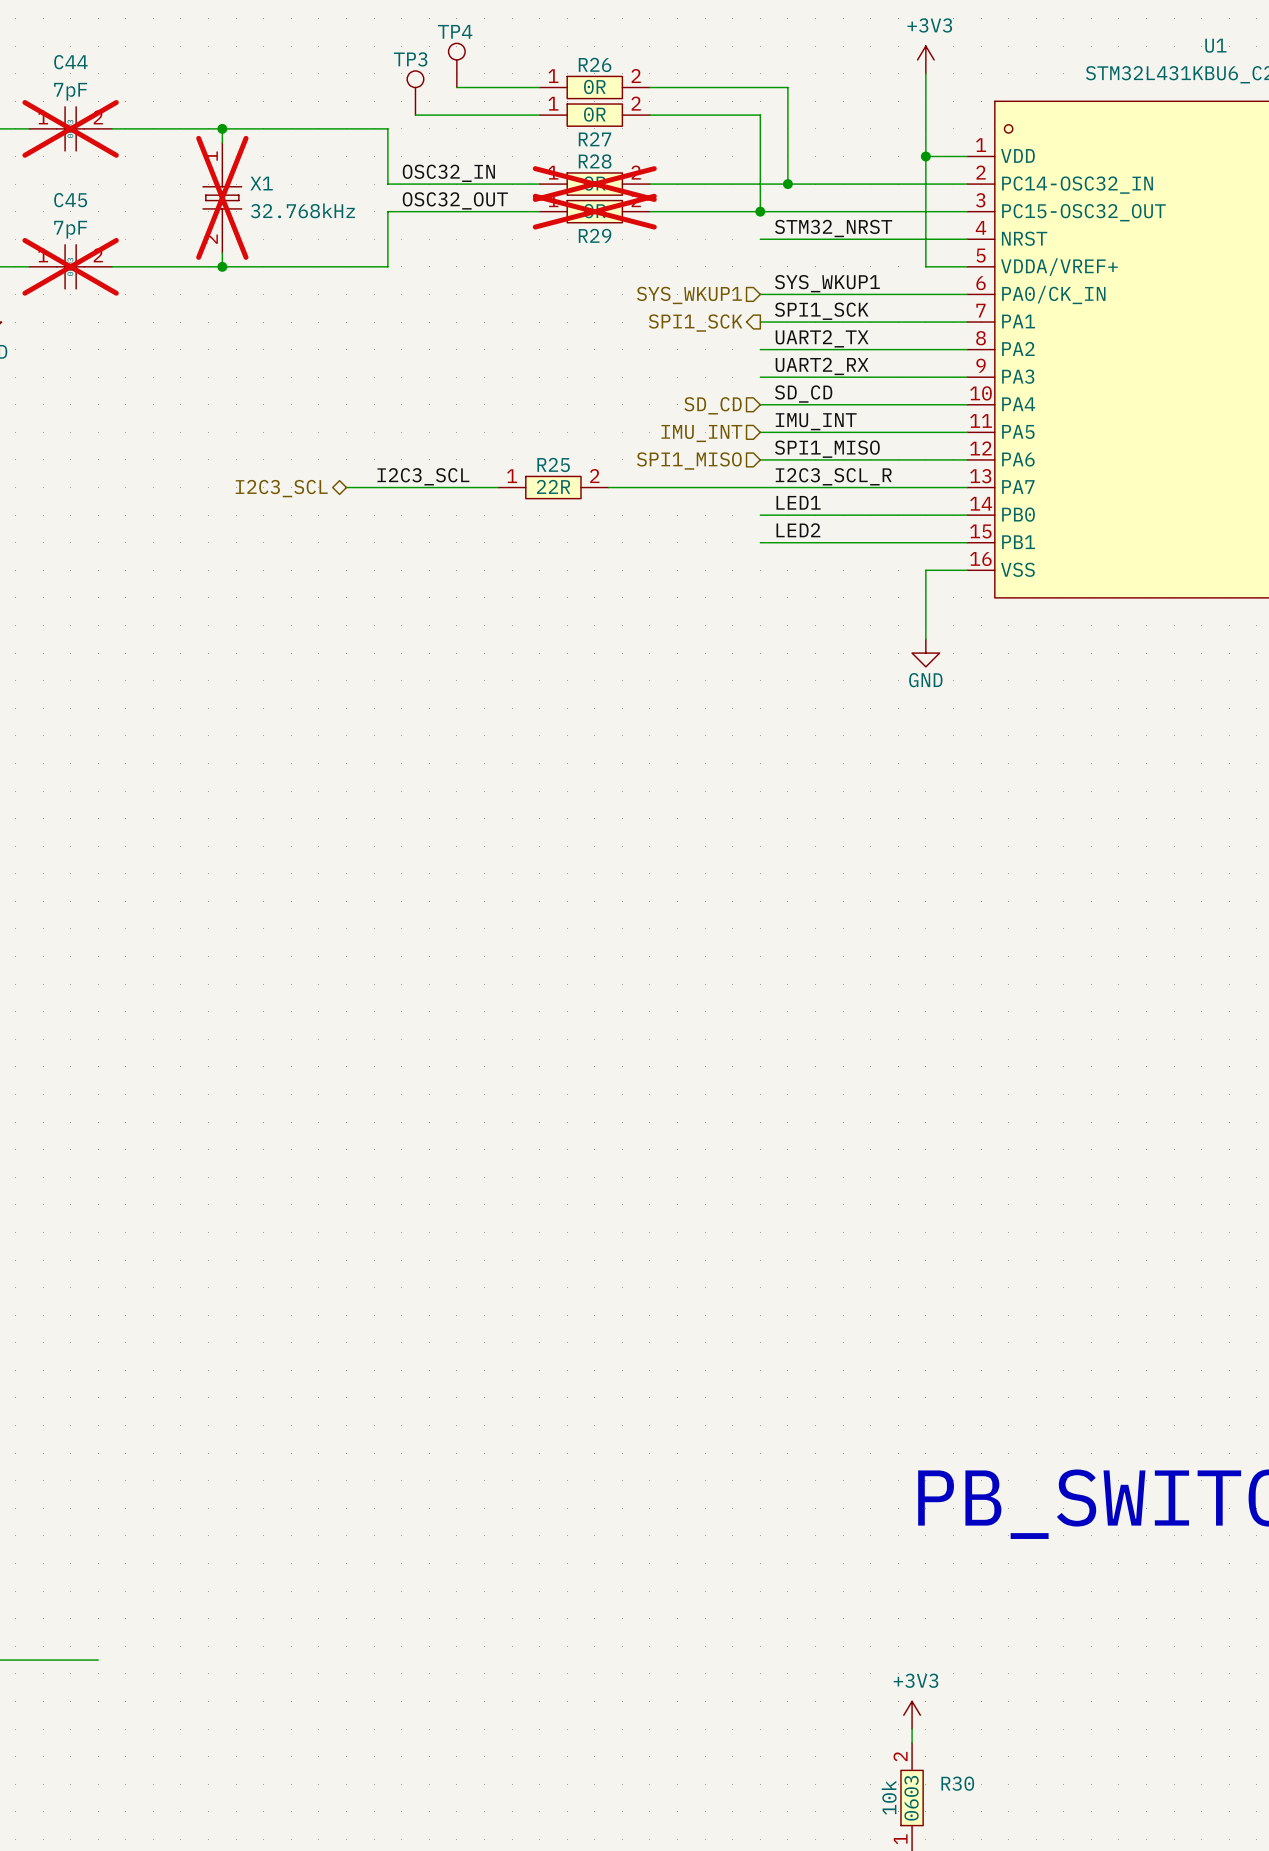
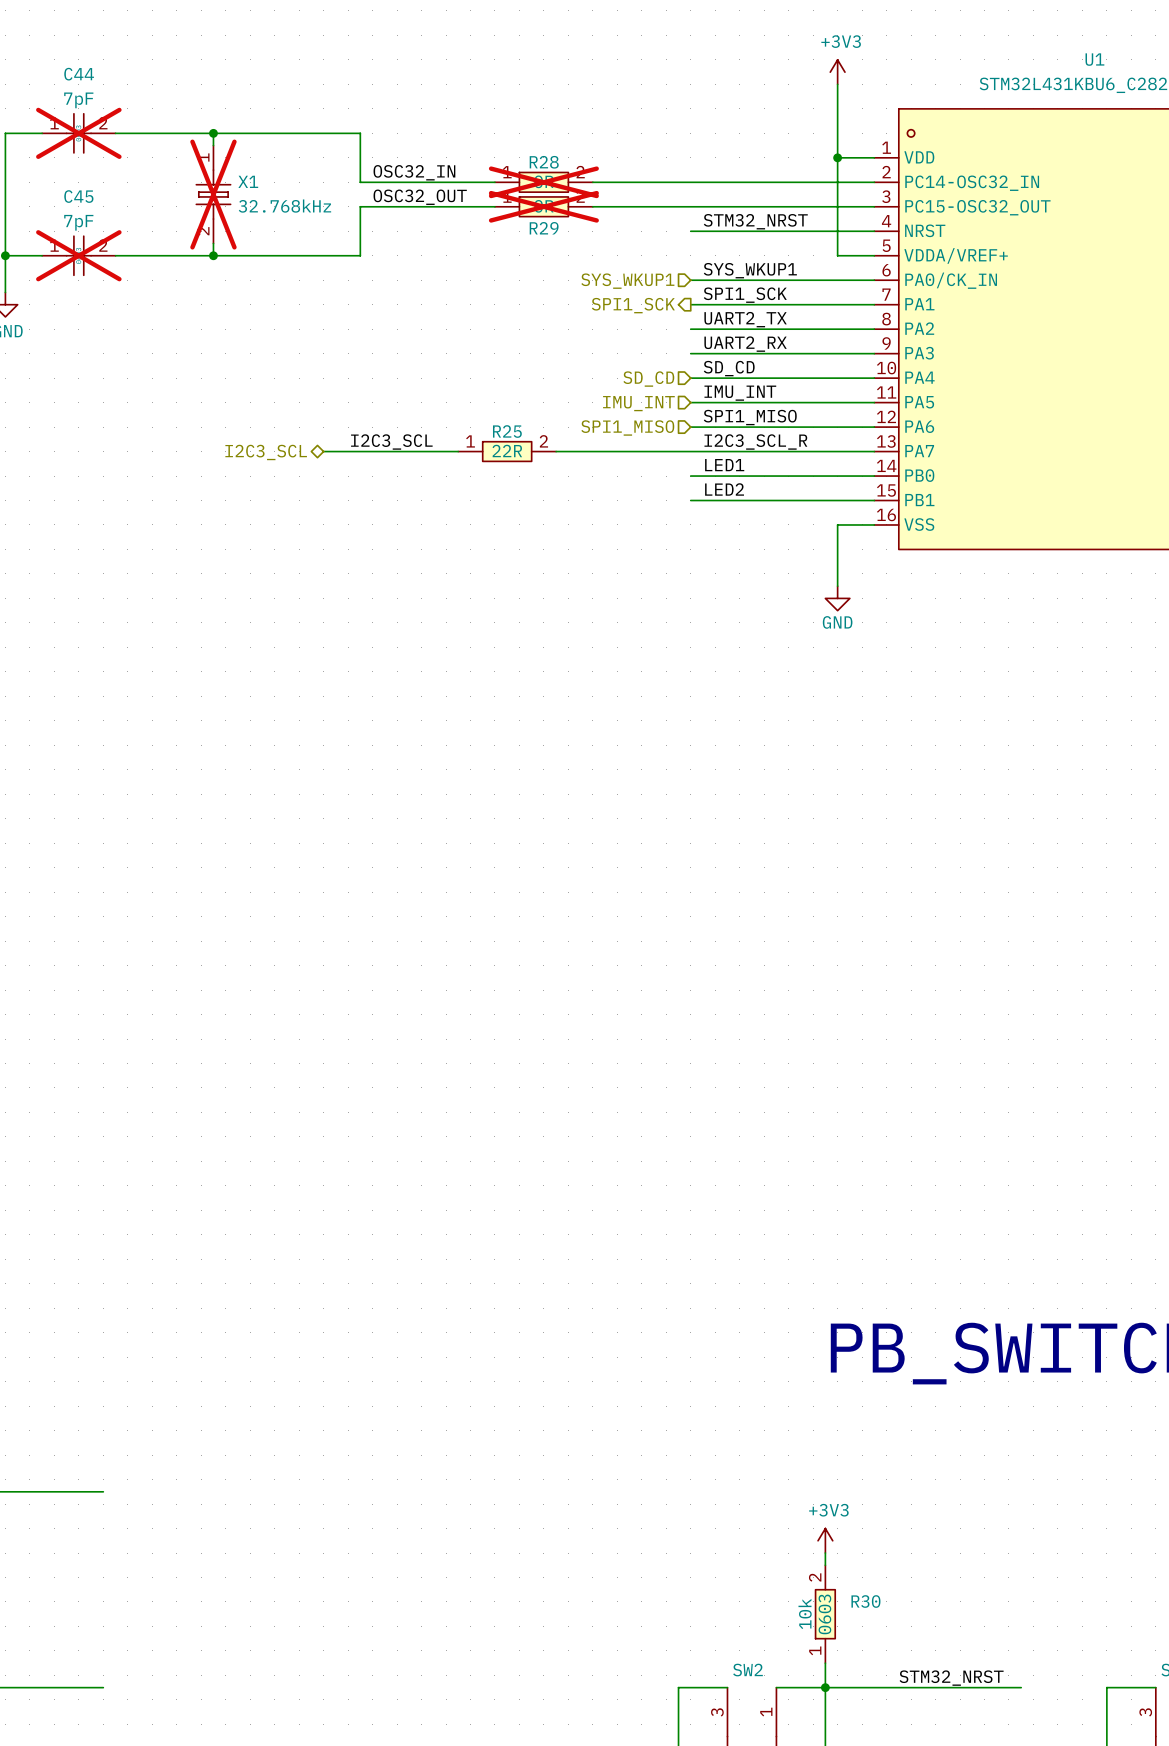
TP4: (456, 65) -> none
wire: (456, 87) (539, 87) -> none
R26: (594, 87) -> none
wire: (649, 87) (787, 87) (787, 184) -> none
TP3: (415, 93) -> none
wire: (415, 115) (539, 115) -> none
R27: (594, 115) -> none
wire: (649, 115) (760, 115) (760, 211) -> none
junction: (787, 184) -> none
junction: (760, 211) -> none

